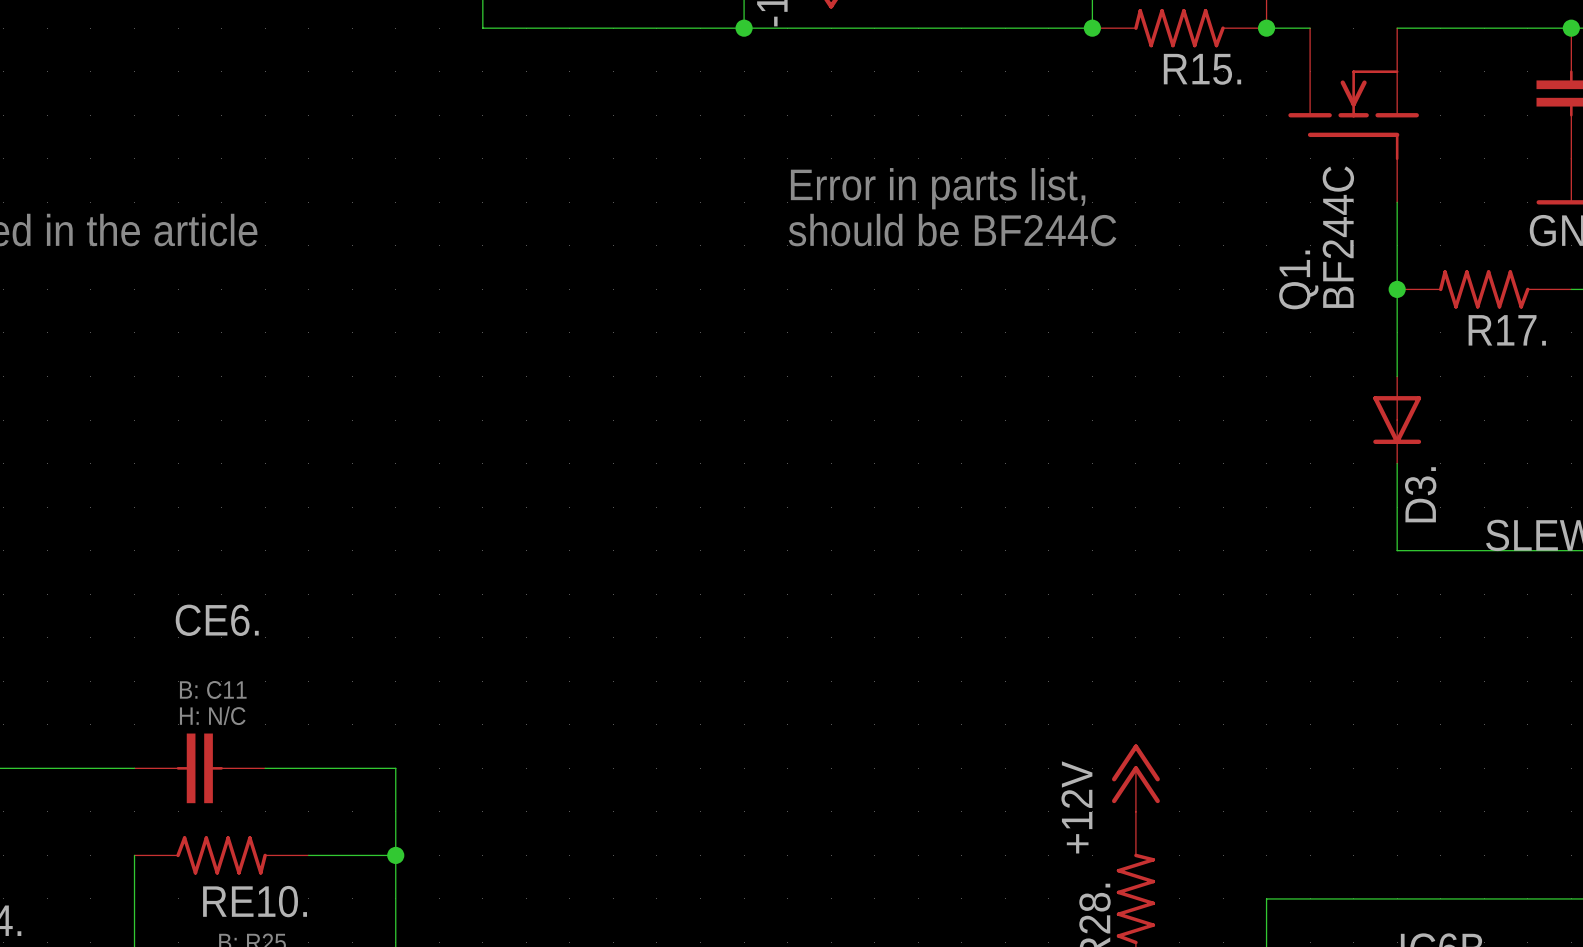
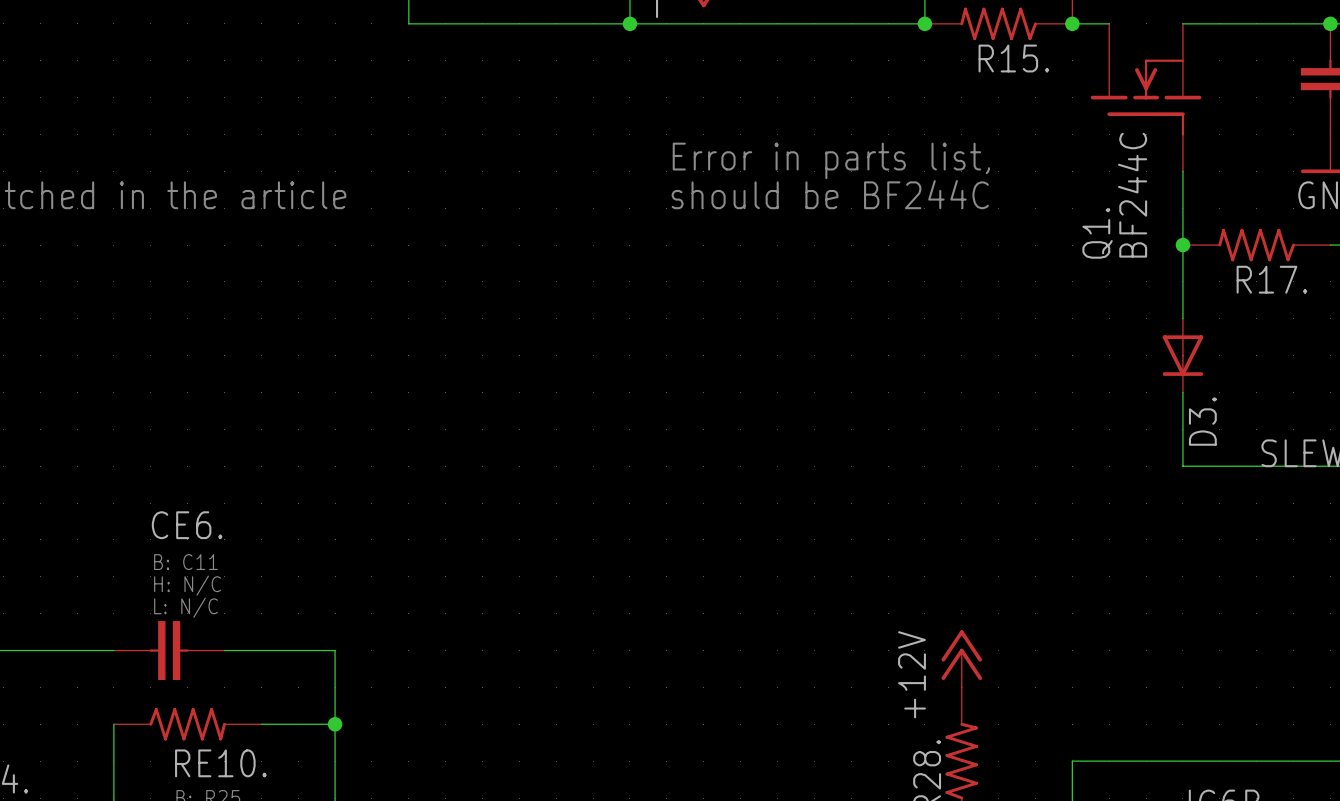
text: none -> B: C11 (185, 562)
text: B: C11 (213, 689) -> H: N/C (187, 585)
text: H: N/C (212, 715) -> L: N/C (185, 607)

